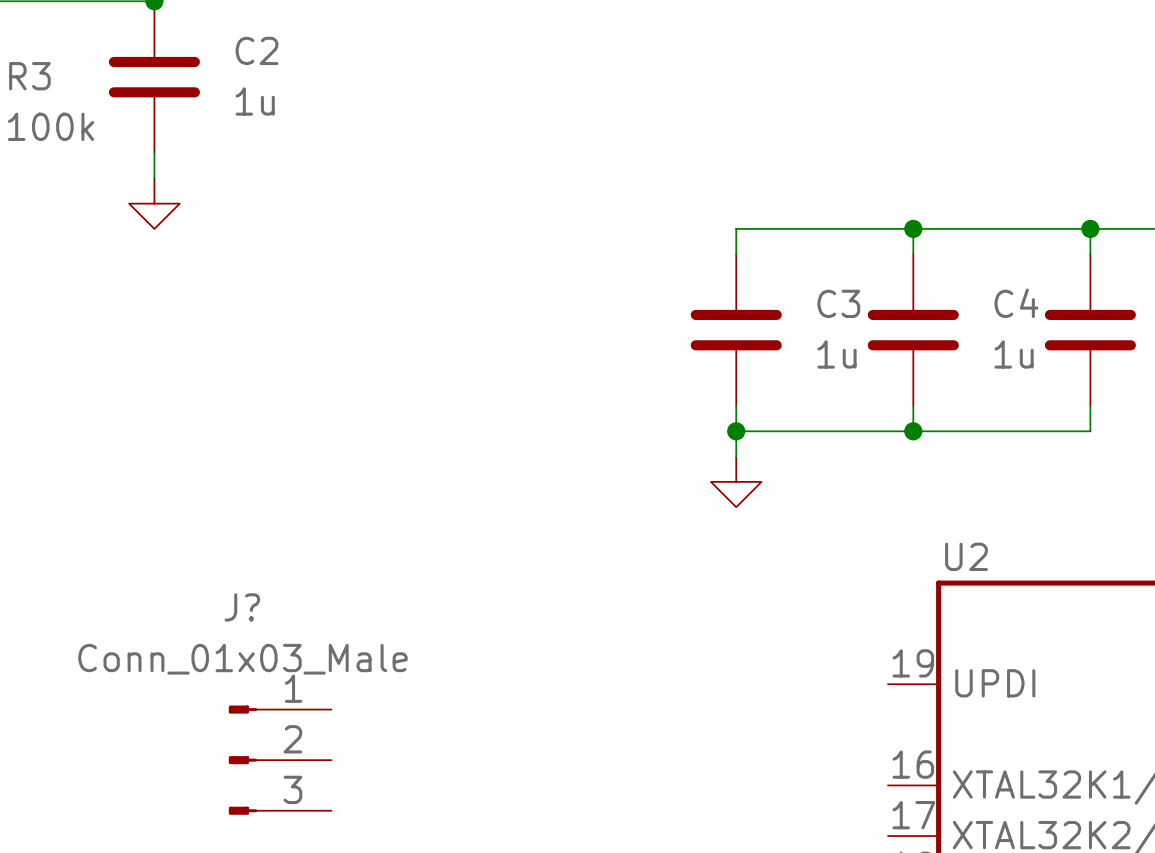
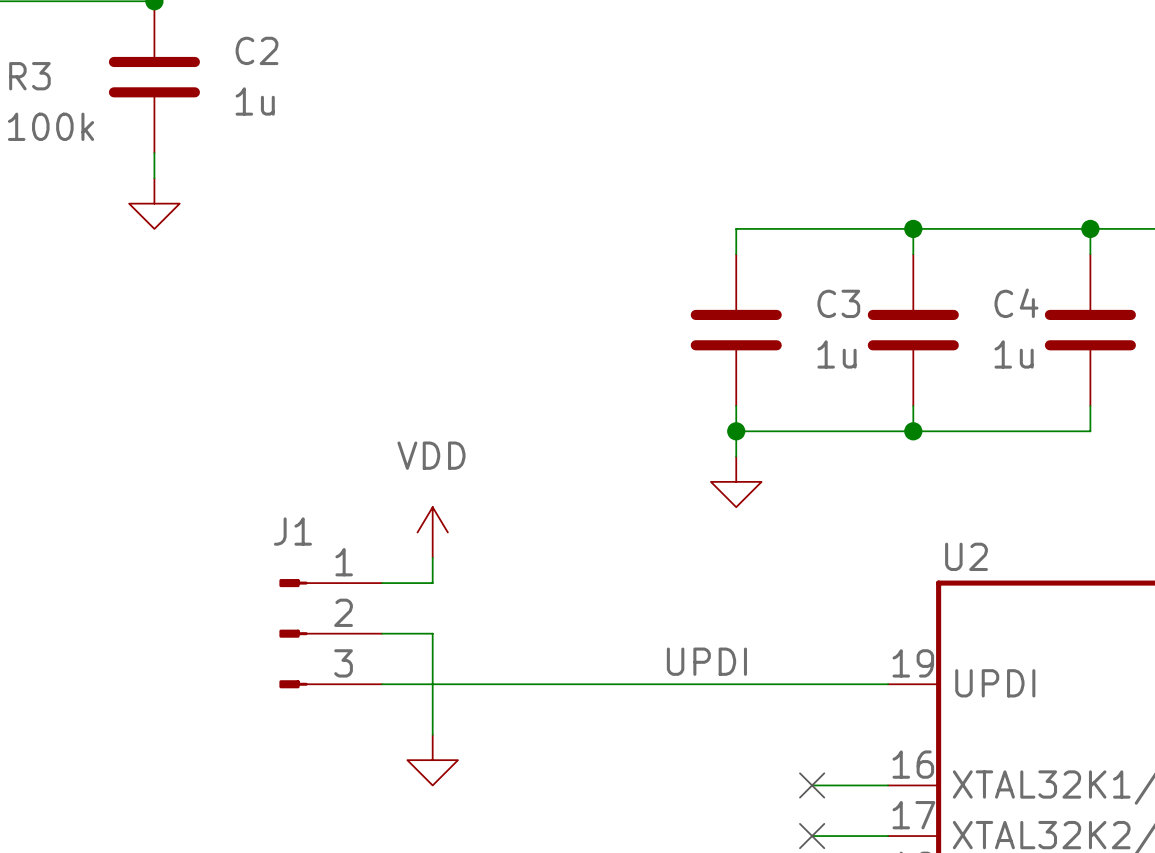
power symbol: none -> VDD (432, 532)
wire: none -> (432, 557) (432, 583) (382, 583)
J1: none -> (330, 633)
wire: none -> (382, 633) (432, 633) (432, 734)
label: none -> UPDI (706, 661)
wire: none -> (382, 684) (888, 684)
J?: Conn_01x03_Male (280, 760) -> none
power symbol: none -> (432, 760)
wire: none -> (812, 785) (888, 785)
no-connect mark: none -> (812, 785)
wire: none -> (812, 836) (888, 836)
no-connect mark: none -> (812, 836)

